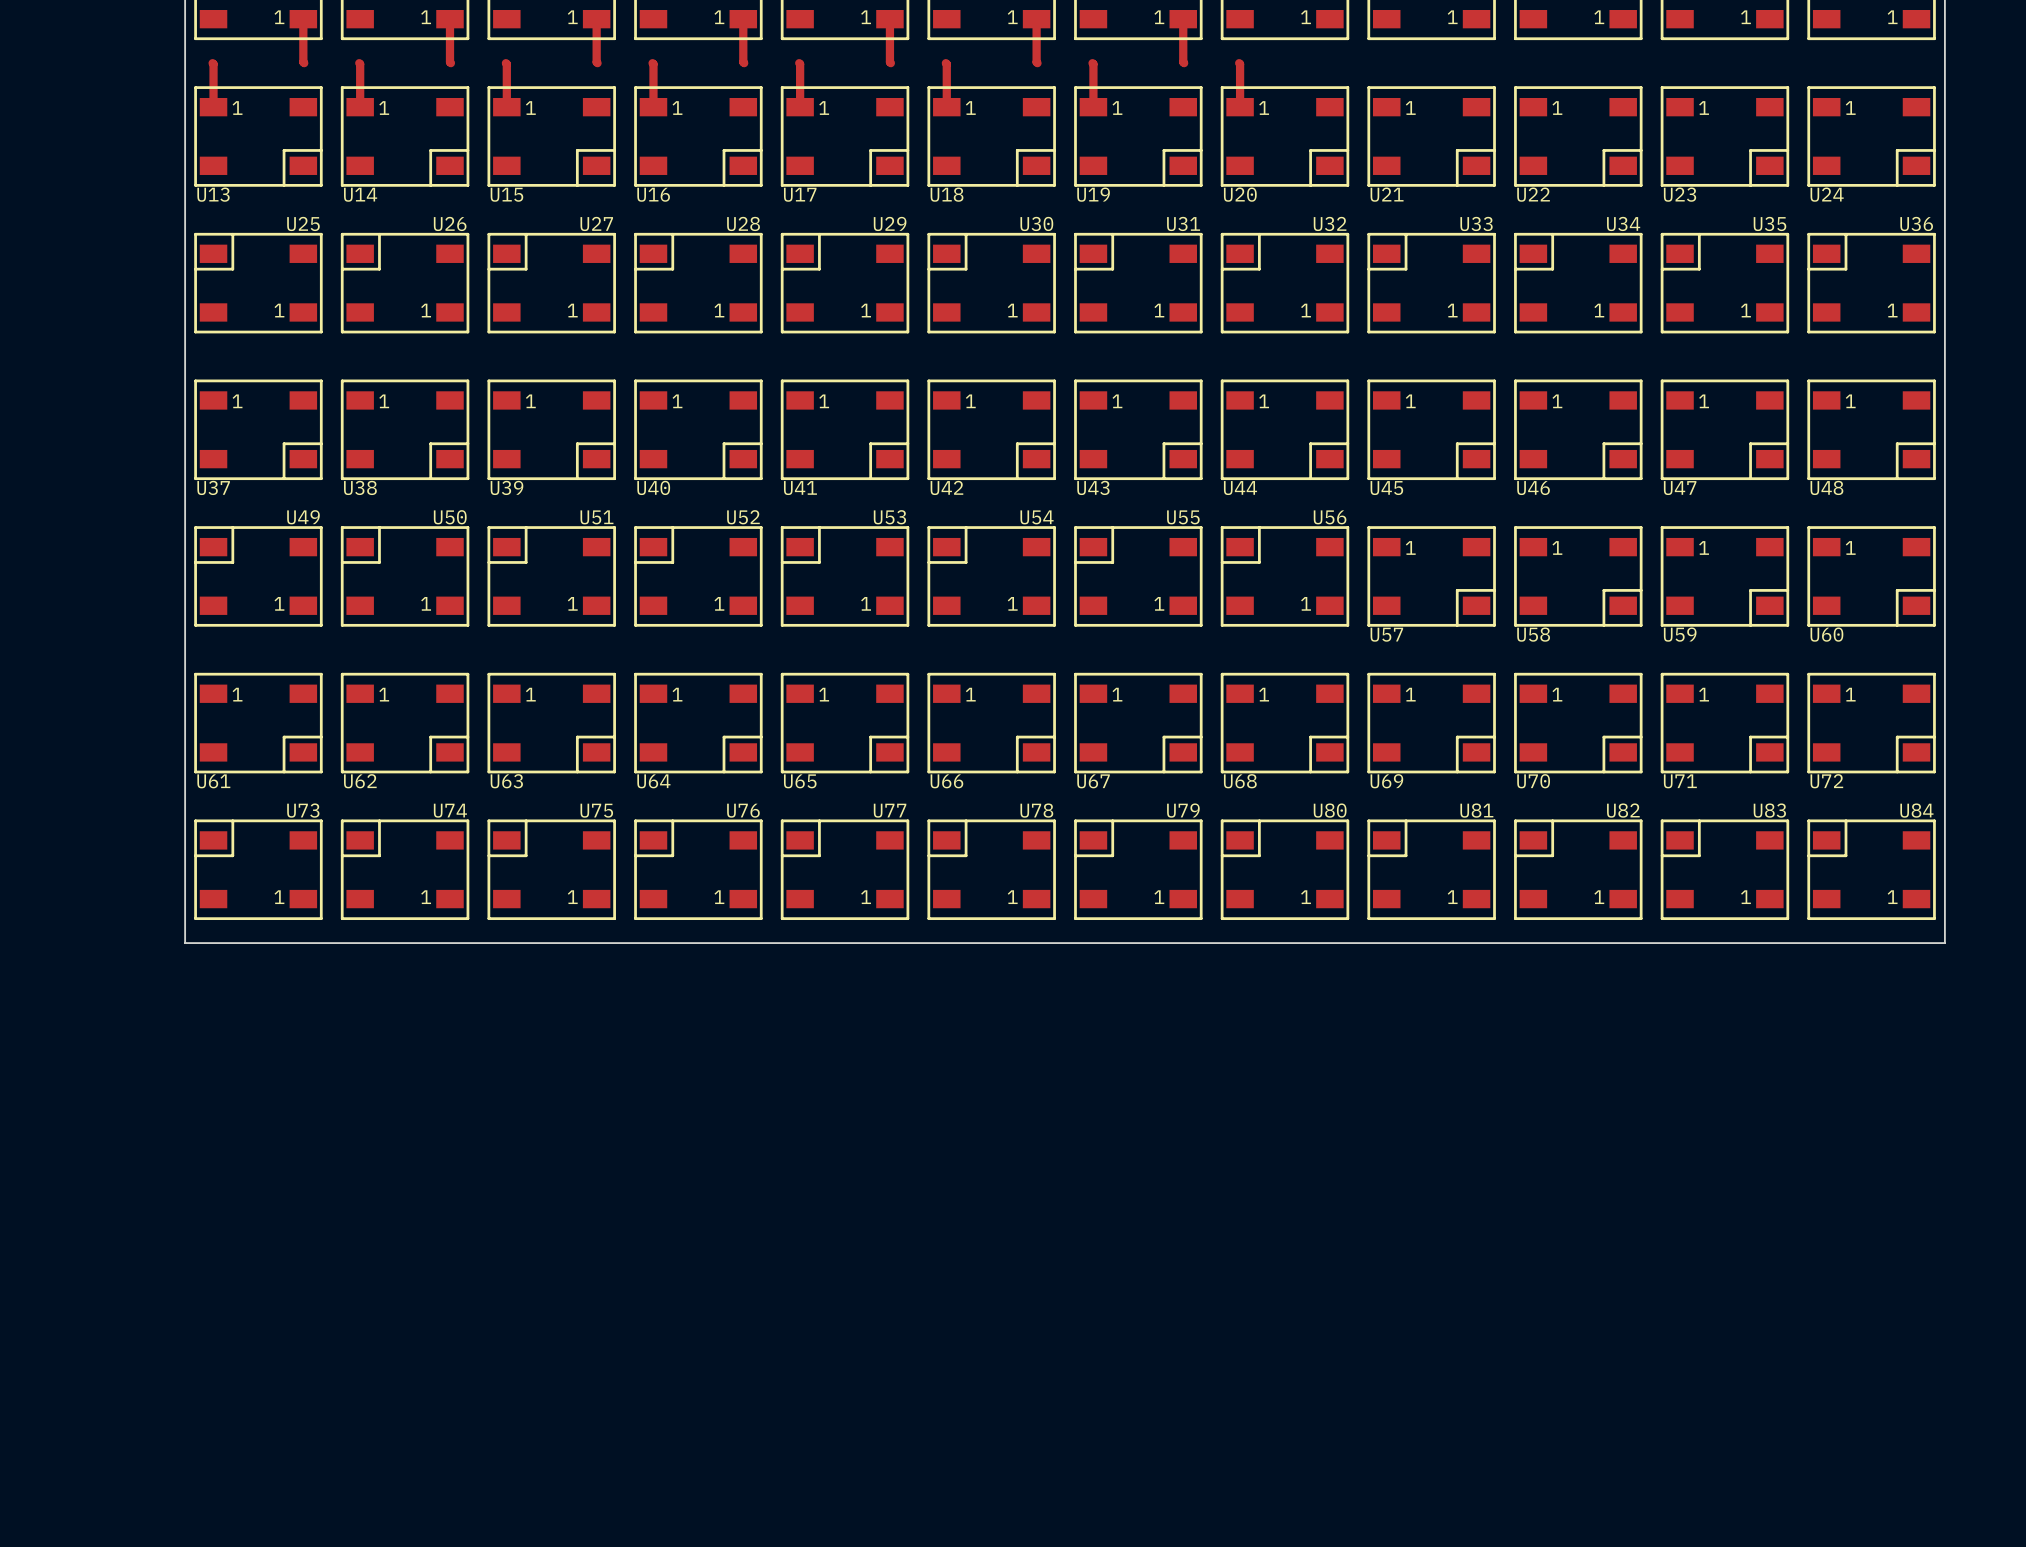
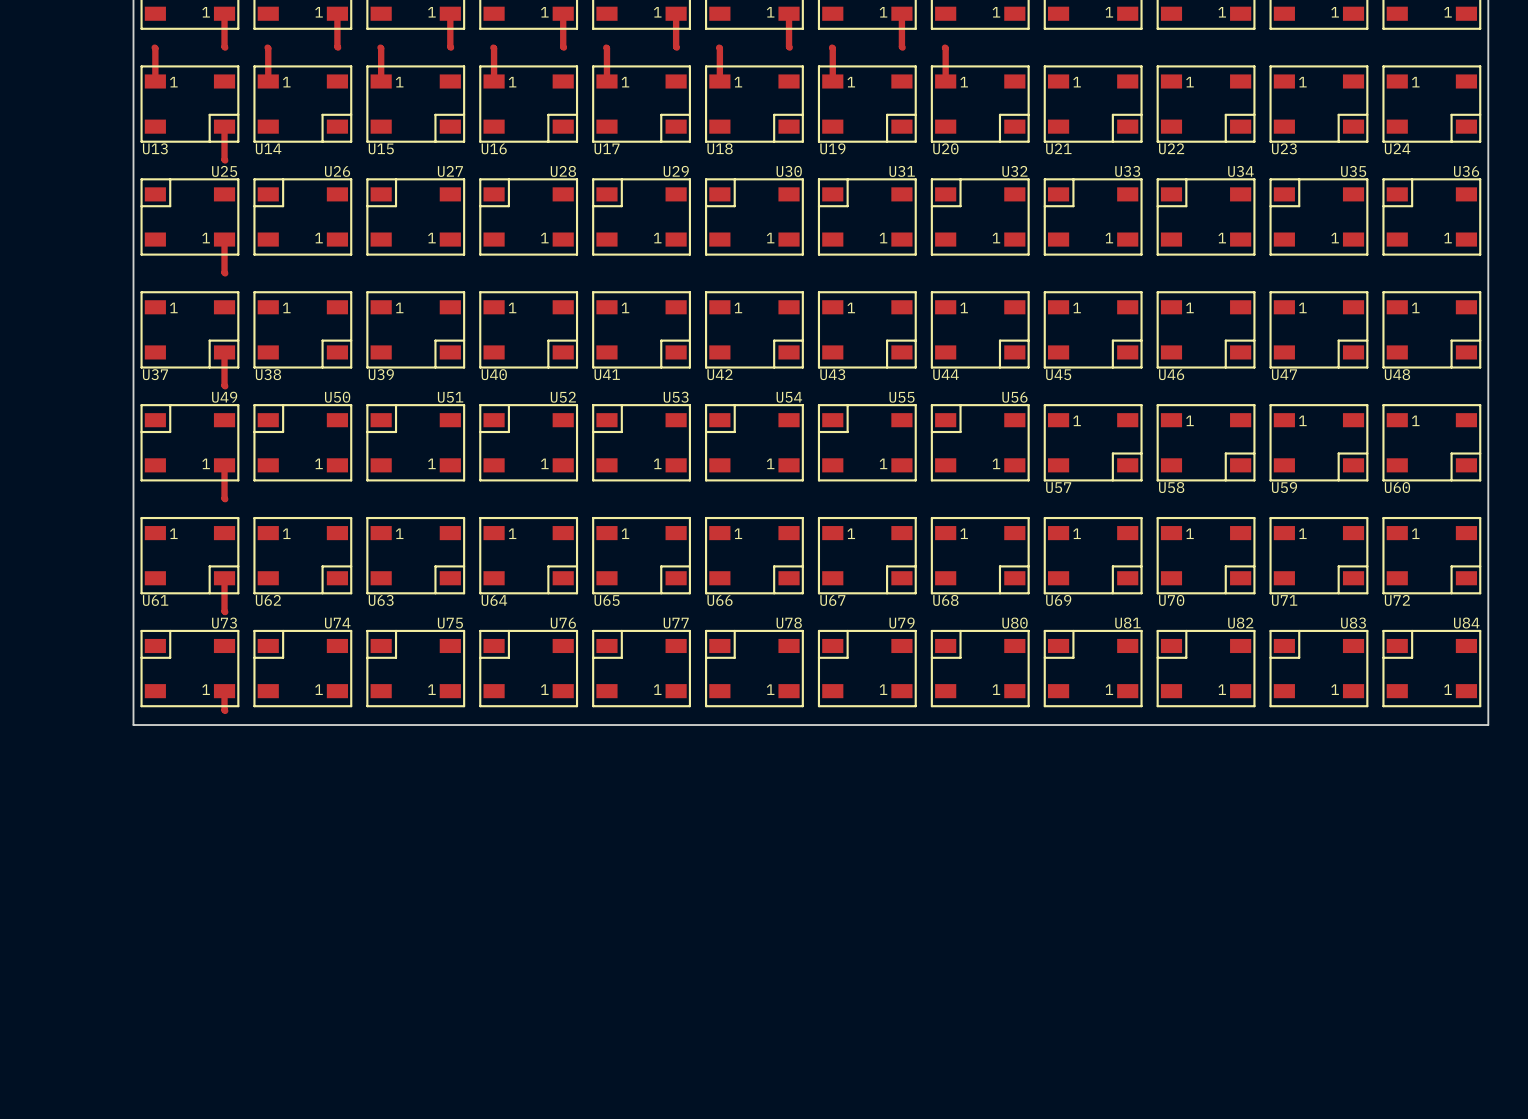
top track: none -> (224, 126) (225, 160)
top track: none -> (224, 239) (225, 273)
top track: none -> (224, 352) (225, 386)
top track: none -> (224, 465) (225, 499)
top track: none -> (224, 578) (225, 612)
top track: none -> (224, 691) (225, 710)

